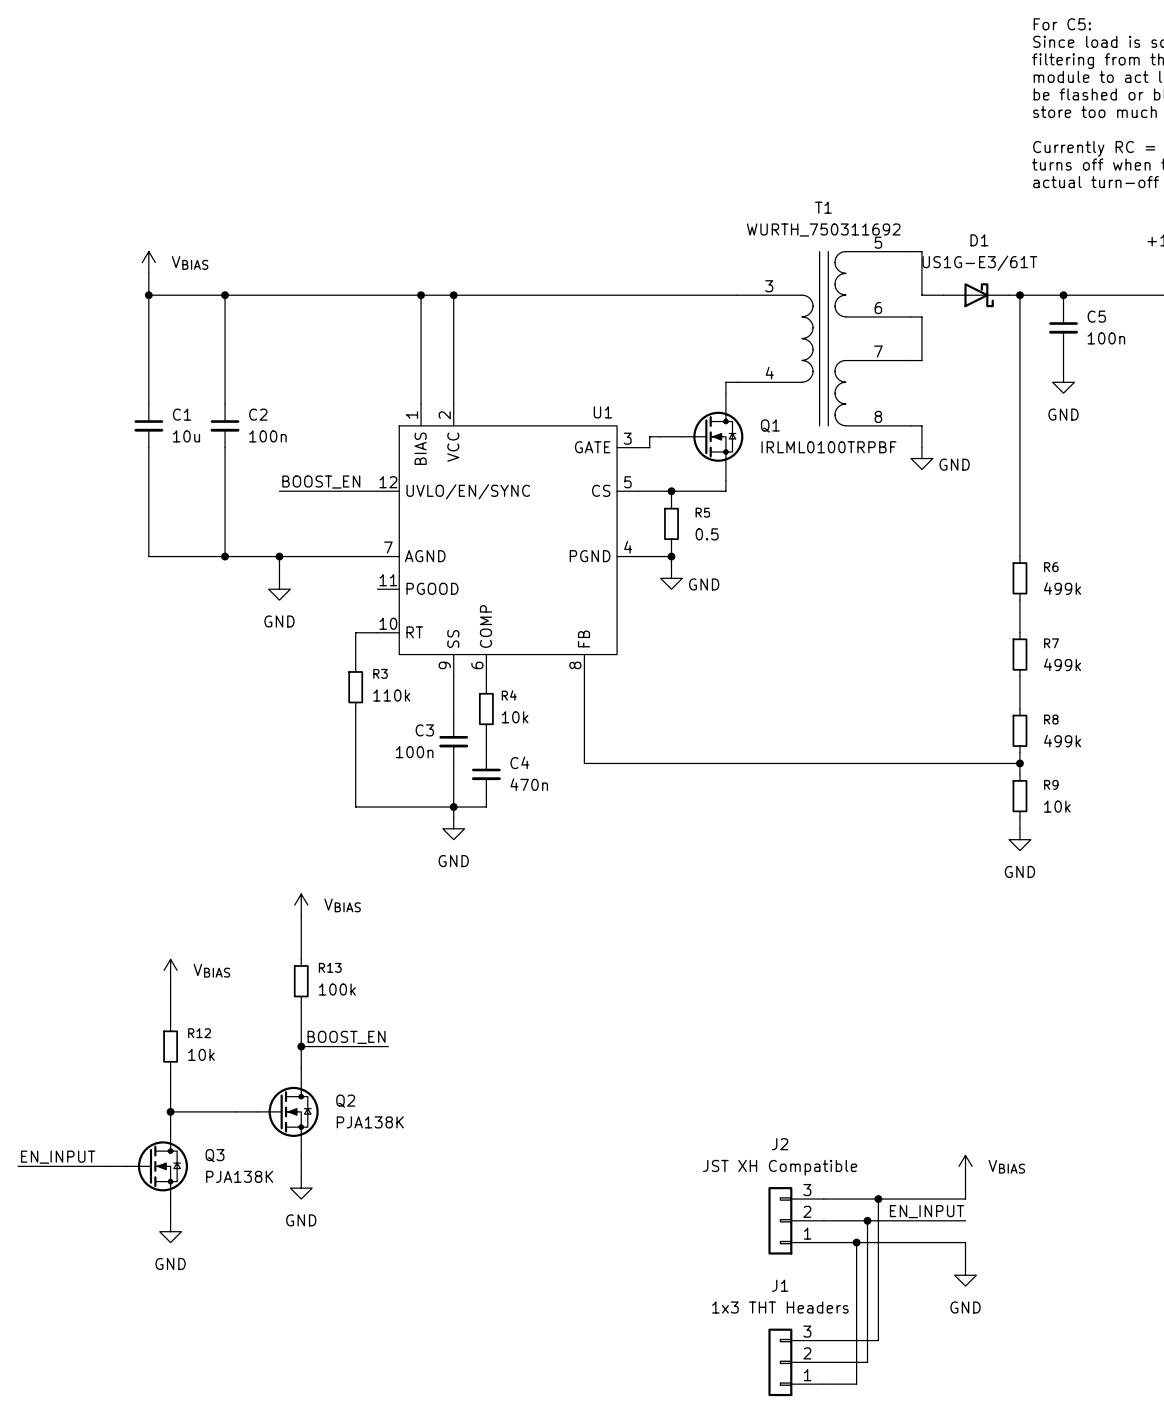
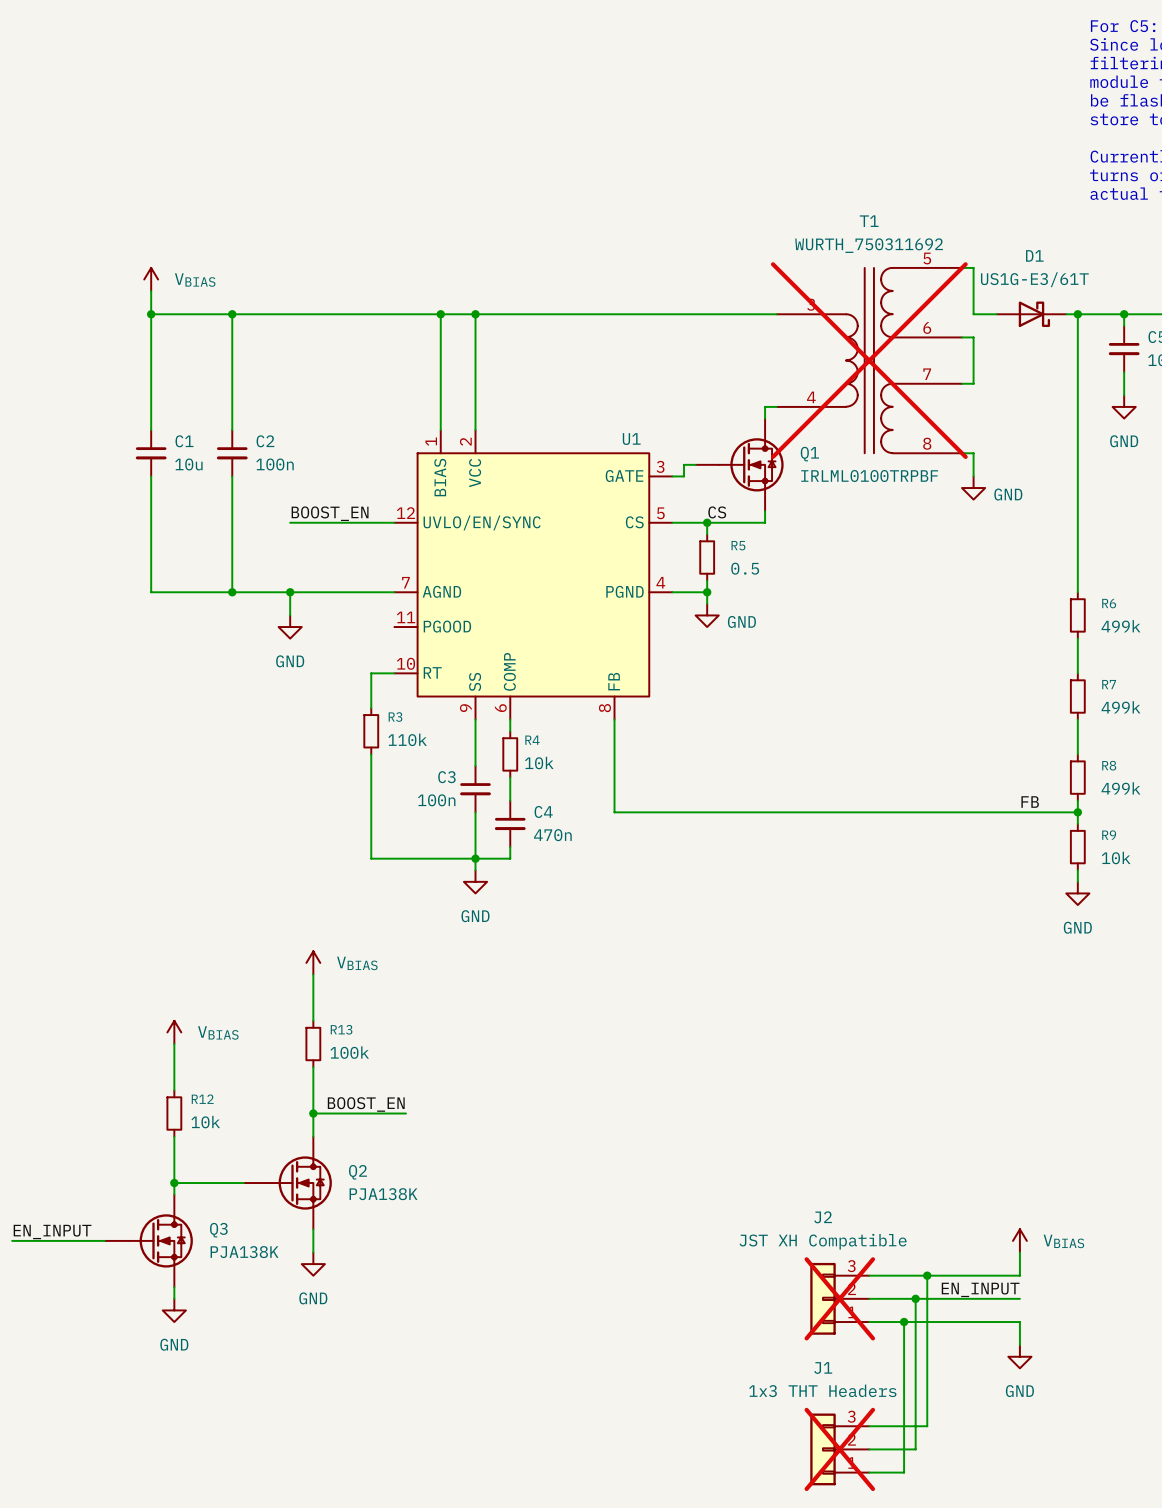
T1 do-not-place cross: none -> (869, 360)
label: none -> CS (717, 512)
label: none -> FB (1030, 802)
J2 do-not-place cross: none -> (839, 1298)
J1 do-not-place cross: none -> (839, 1449)

